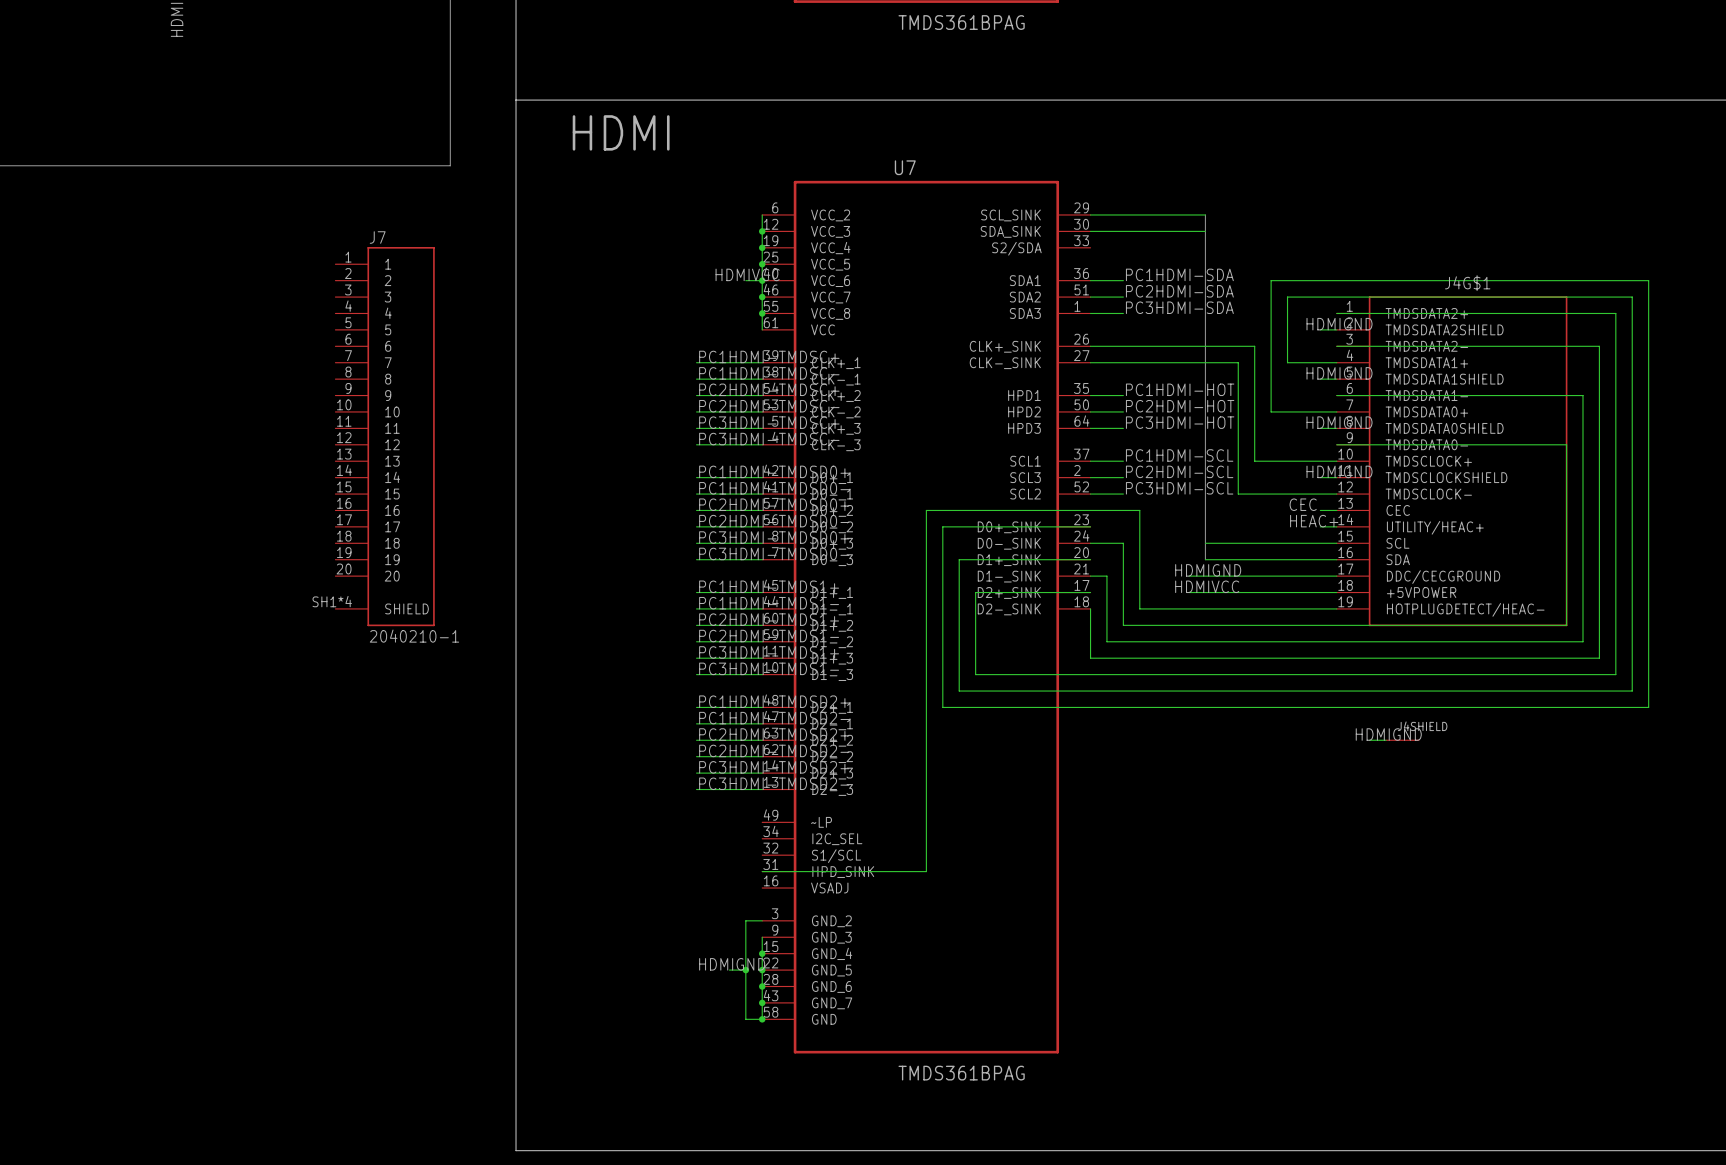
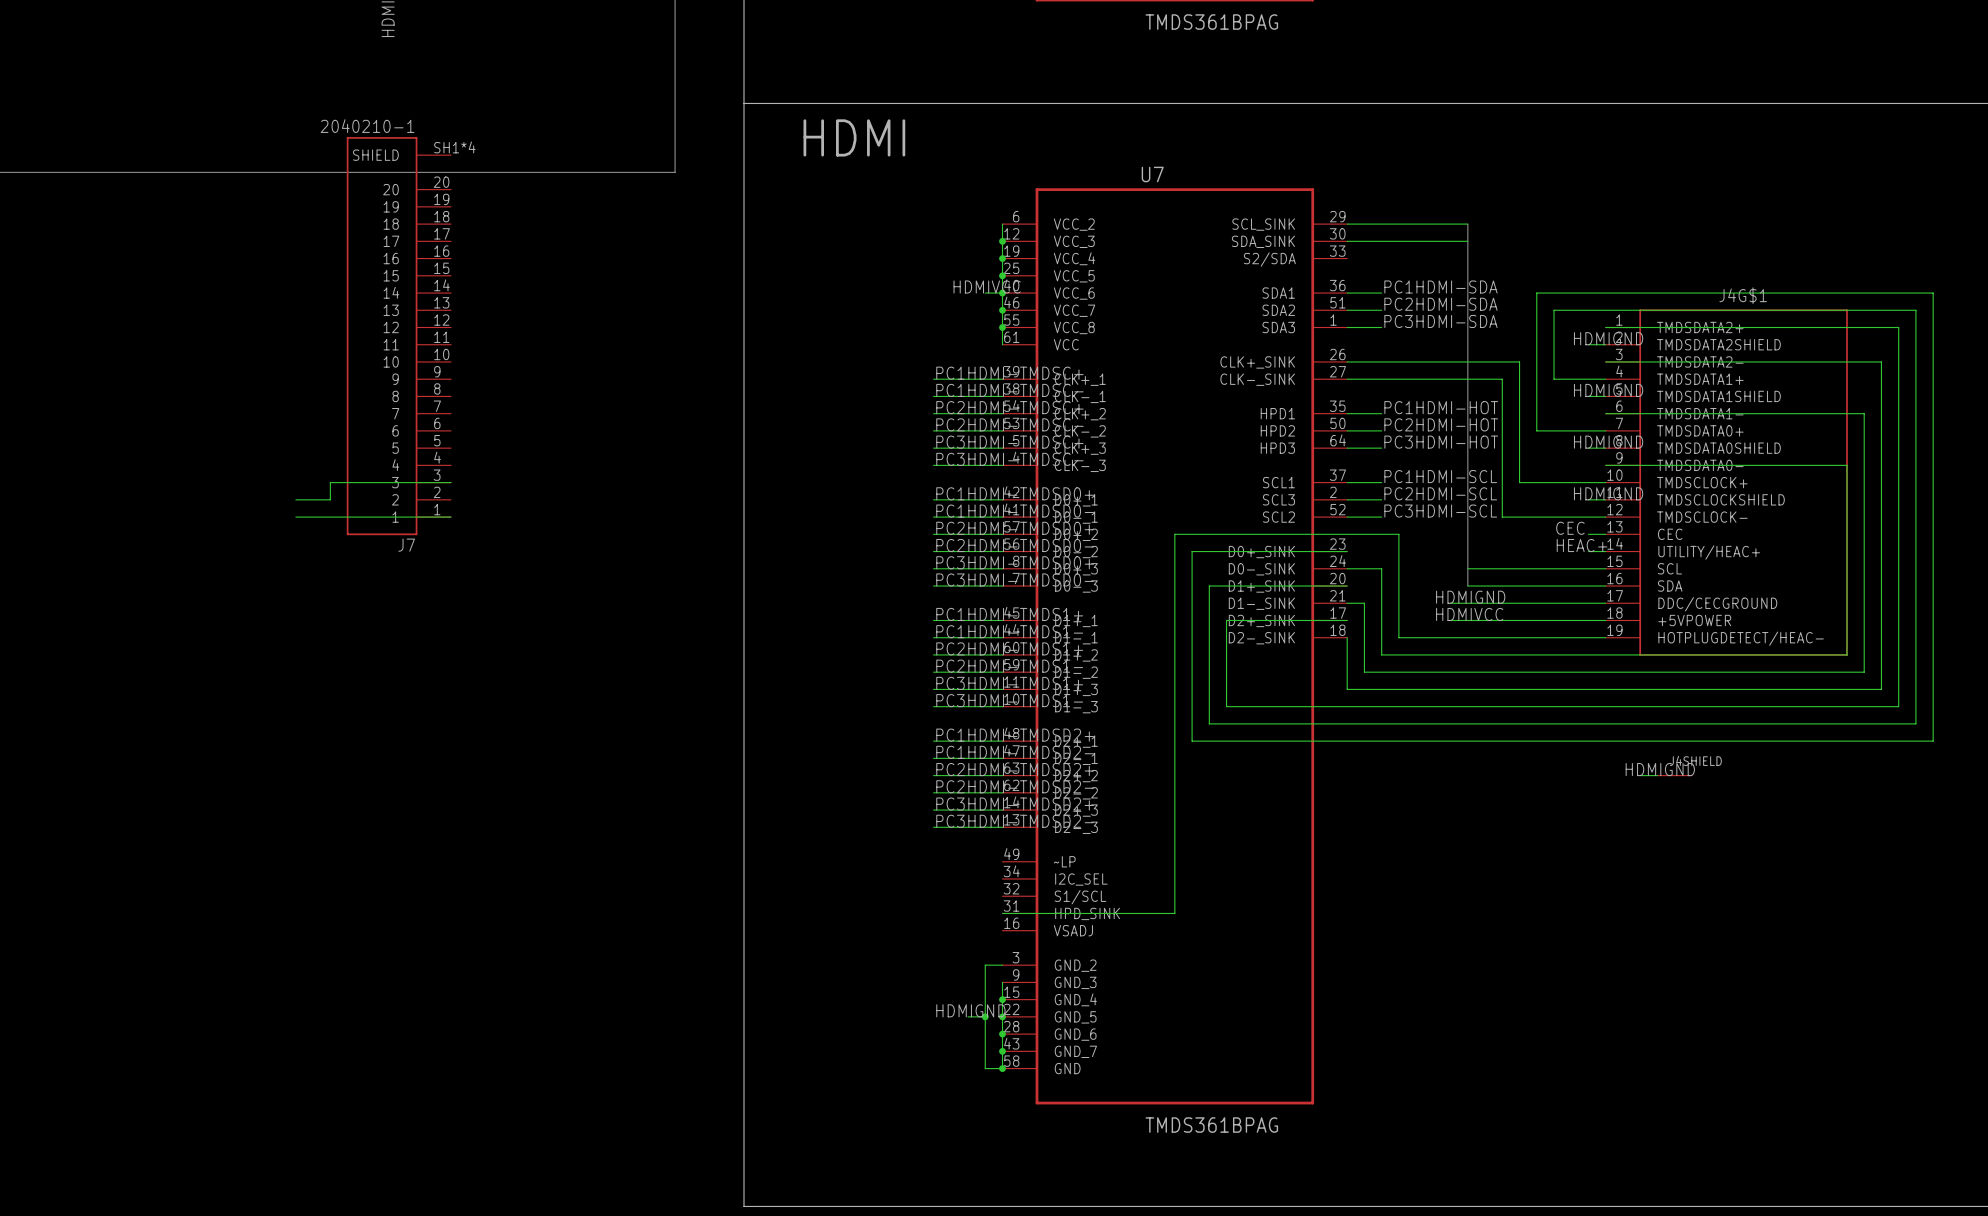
J7 position: (385, 436) -> (398, 336)
J7 rotation: 0° (401, 436) -> 180° (382, 336)
wire: none -> (451, 482) (330, 482) (330, 499) (295, 499)
wire: none -> (295, 517) (451, 517)

